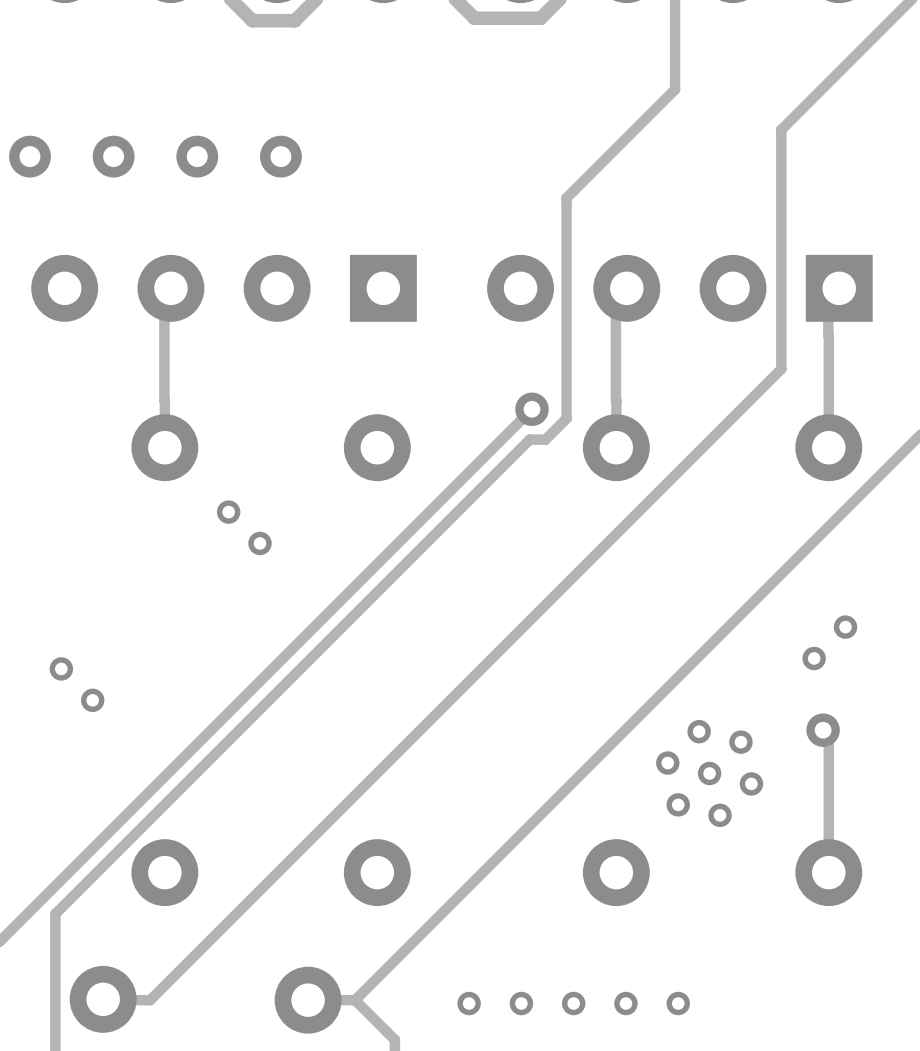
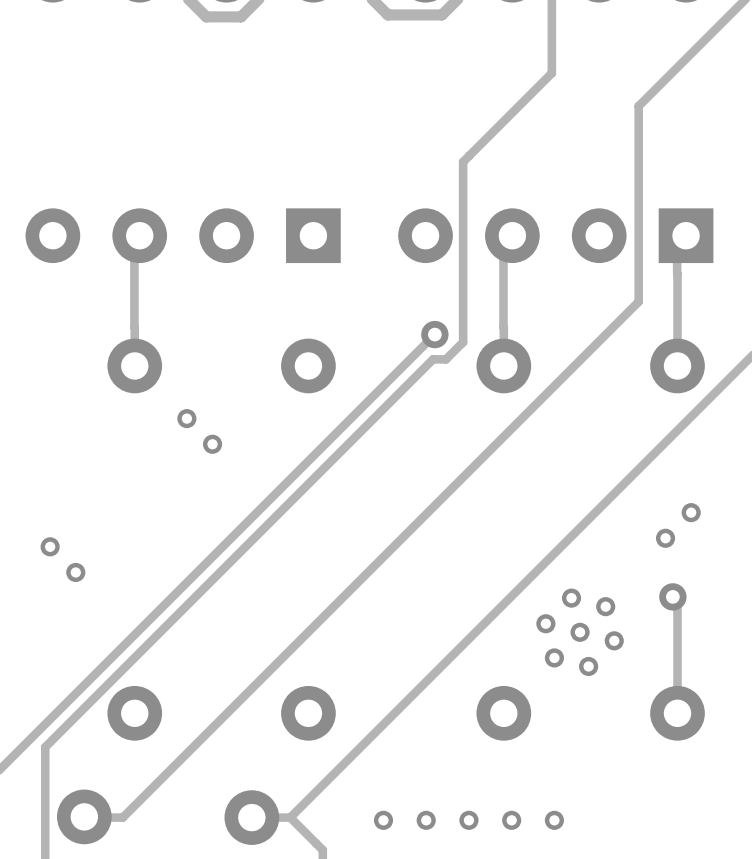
via: (29, 156) -> none
via: (113, 156) -> none
via: (197, 156) -> none
via: (280, 156) -> none

